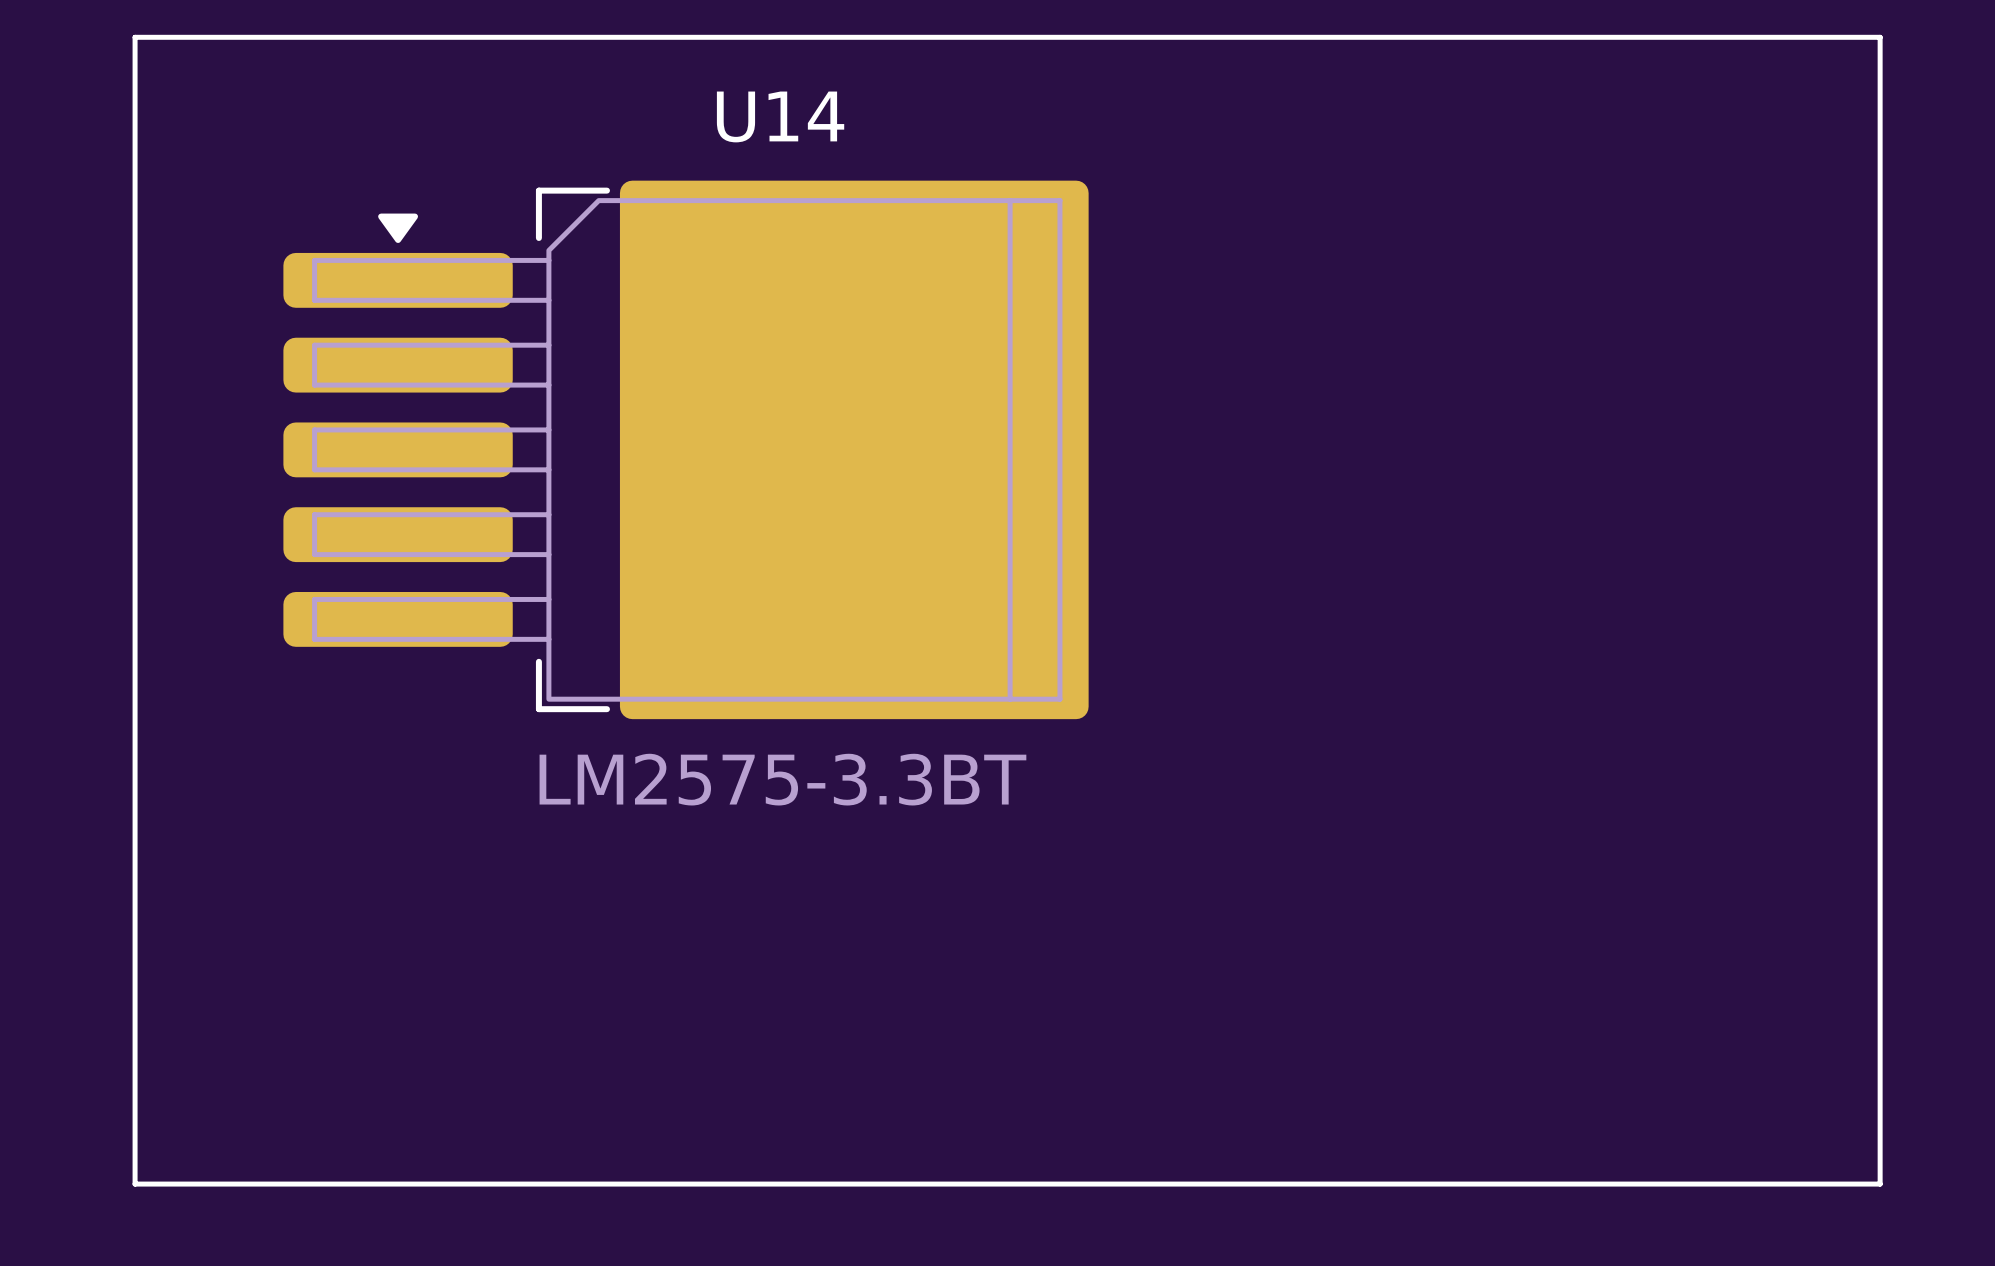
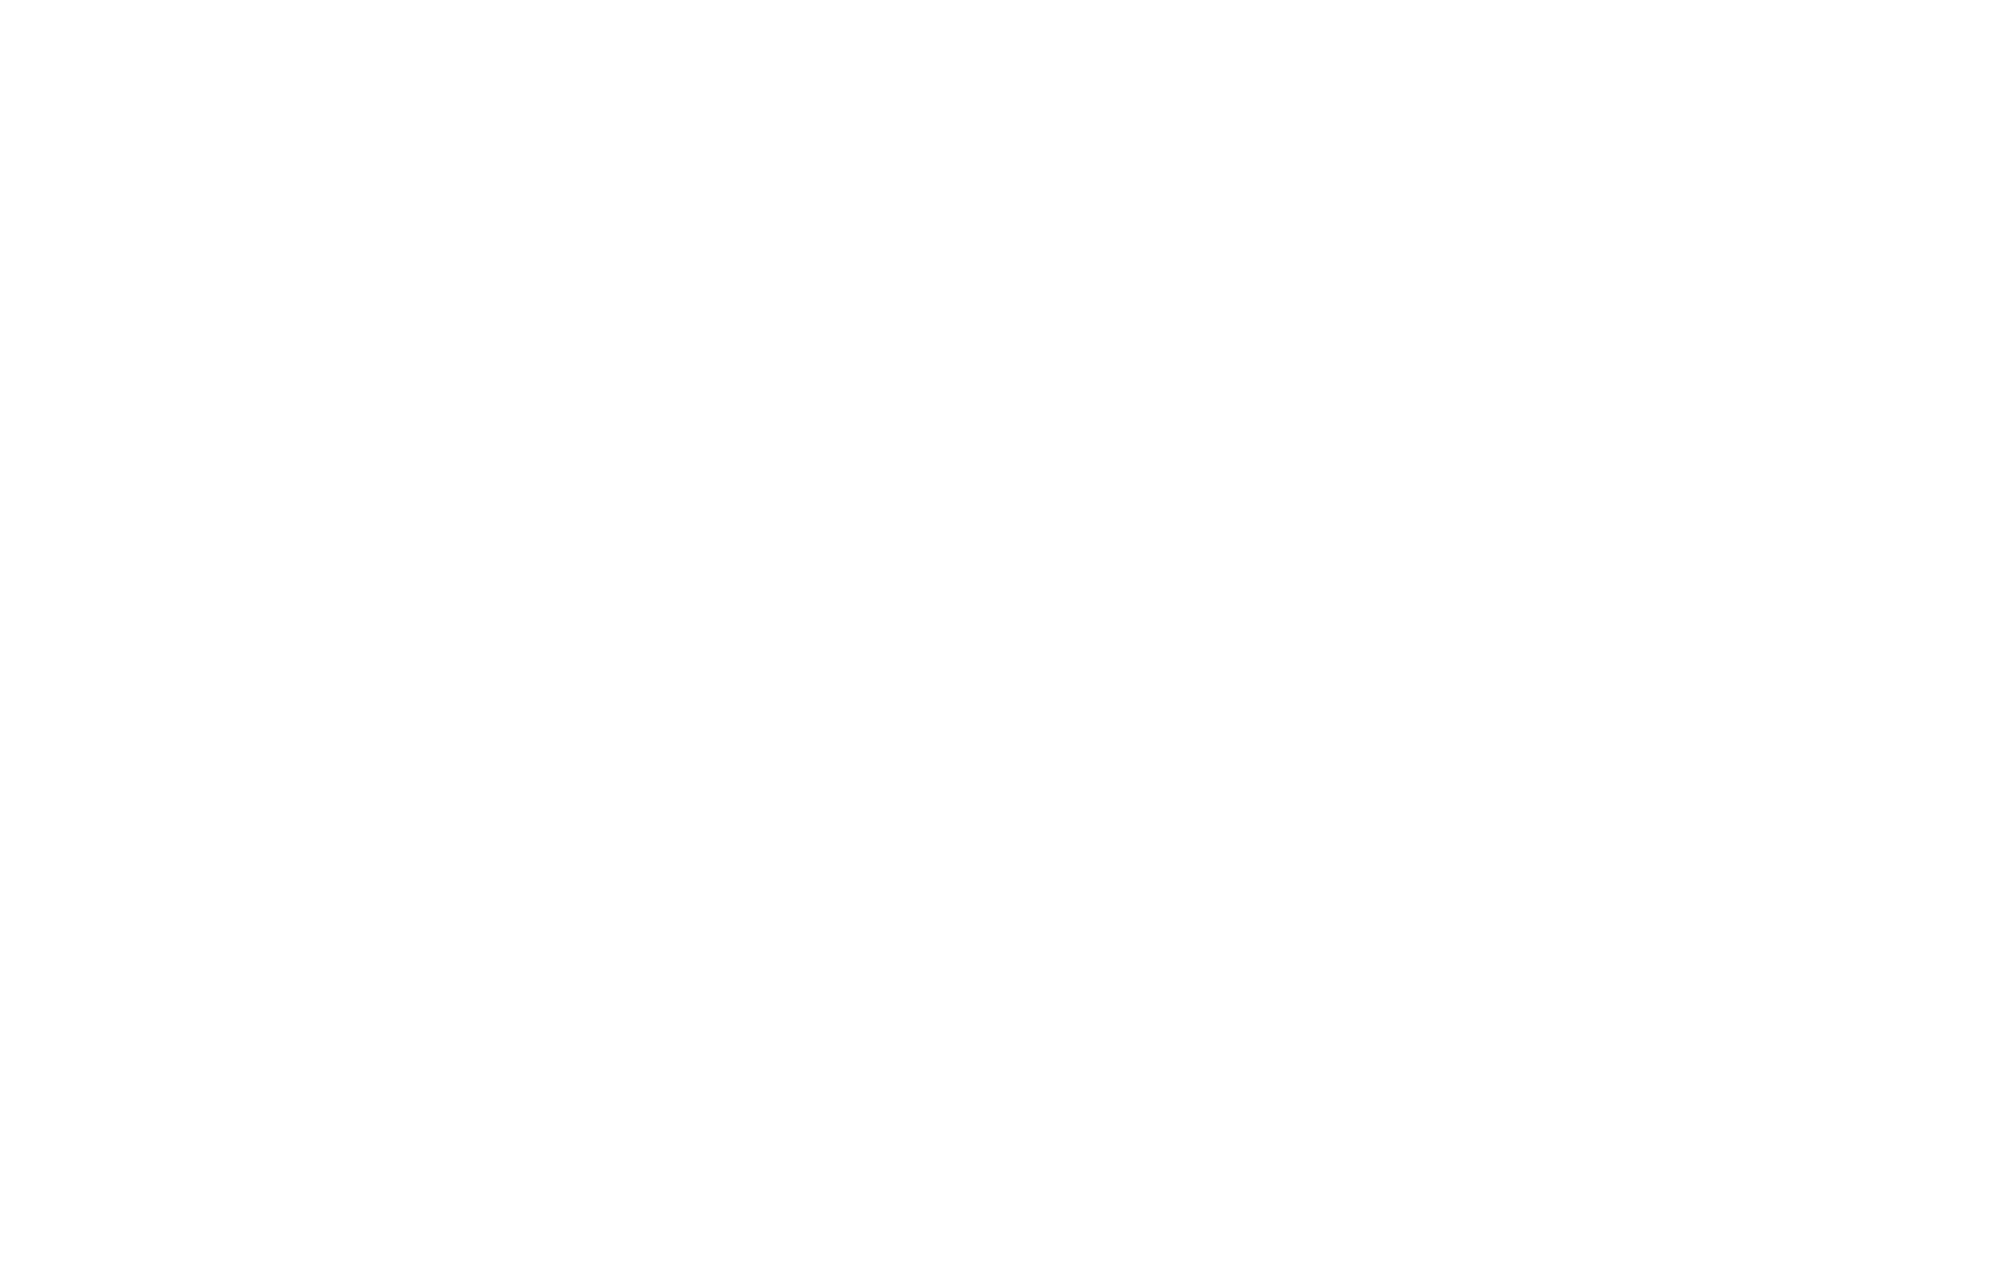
line: (135, 37) (1880, 37) (1880, 1184) (135, 1184) (135, 37) -> none
U14: LM2575-3.3BT (686, 449) -> none

